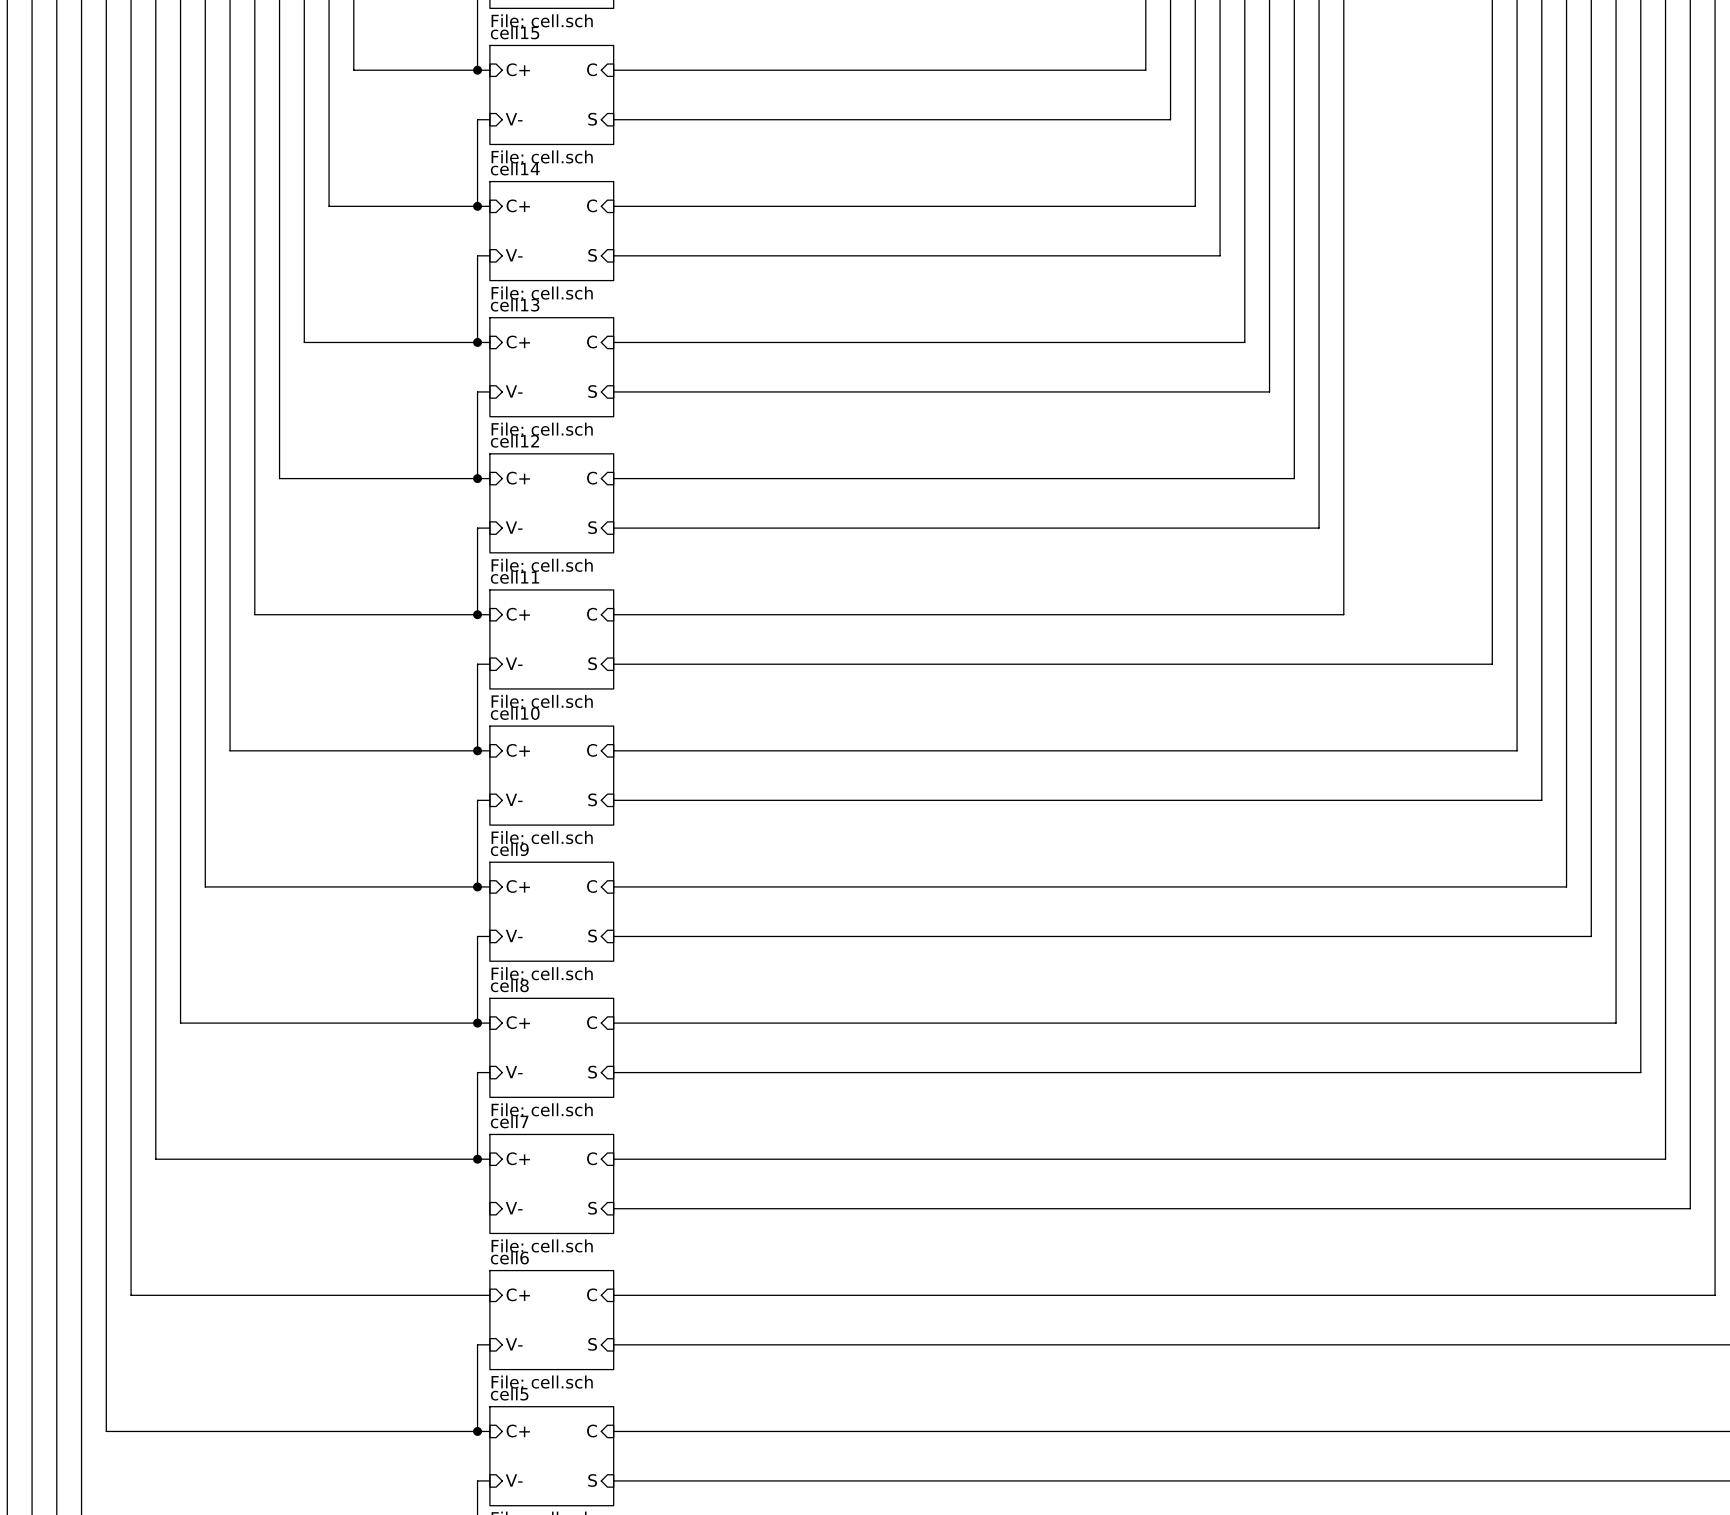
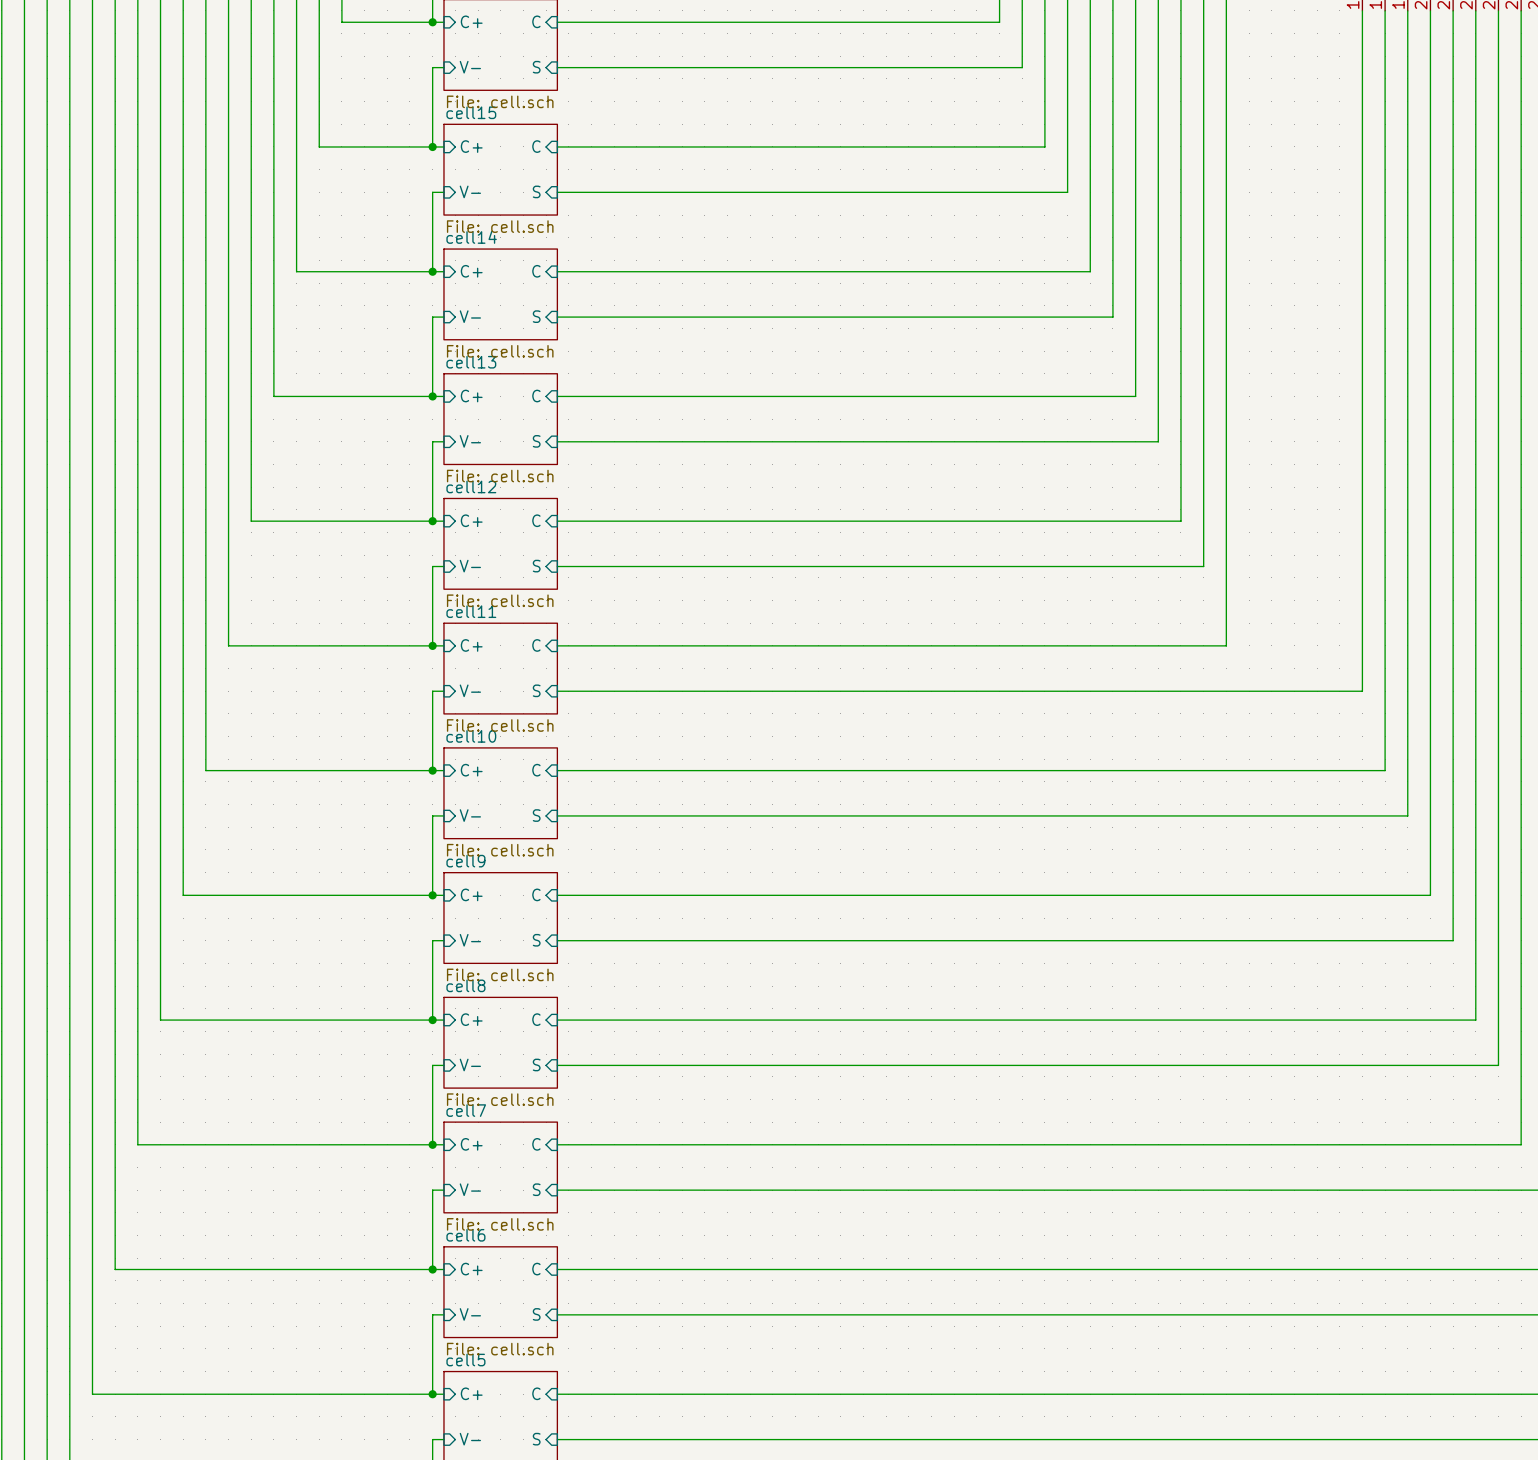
wire: none -> (443, 1190) (432, 1190) (432, 1269)
junction: none -> (432, 1269)

